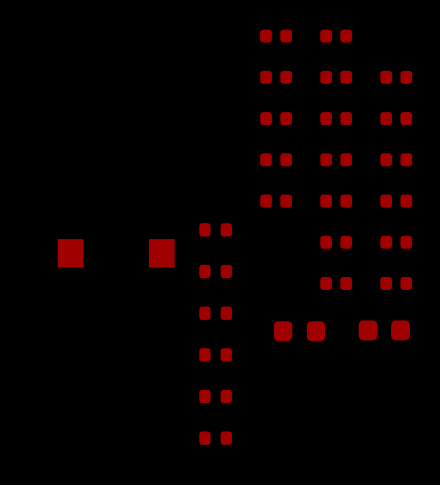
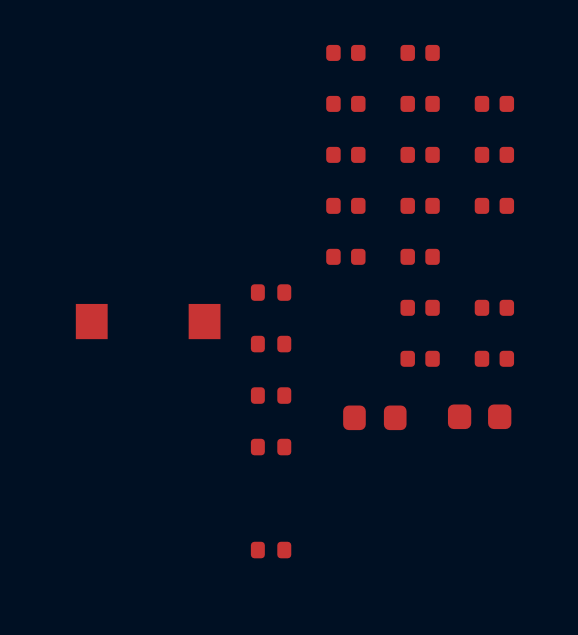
part: (396, 201) -> none
part: (215, 396) -> none

